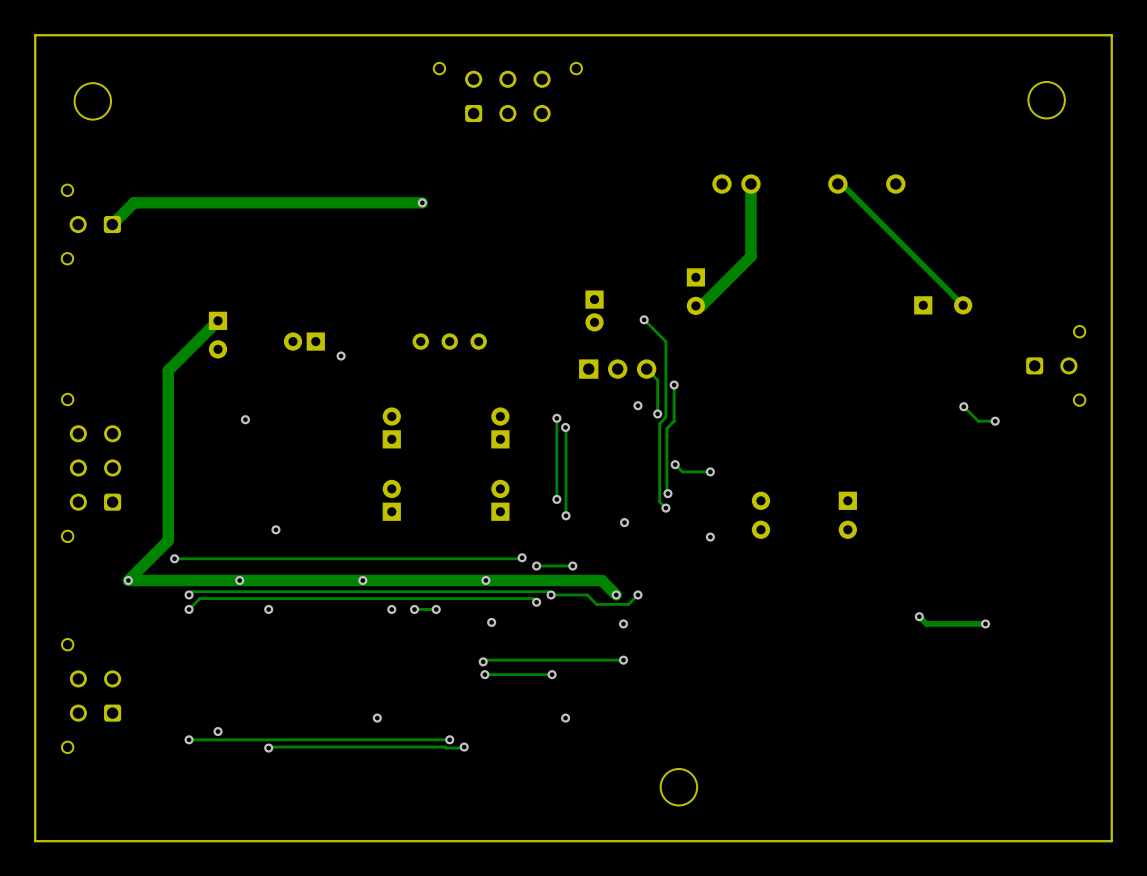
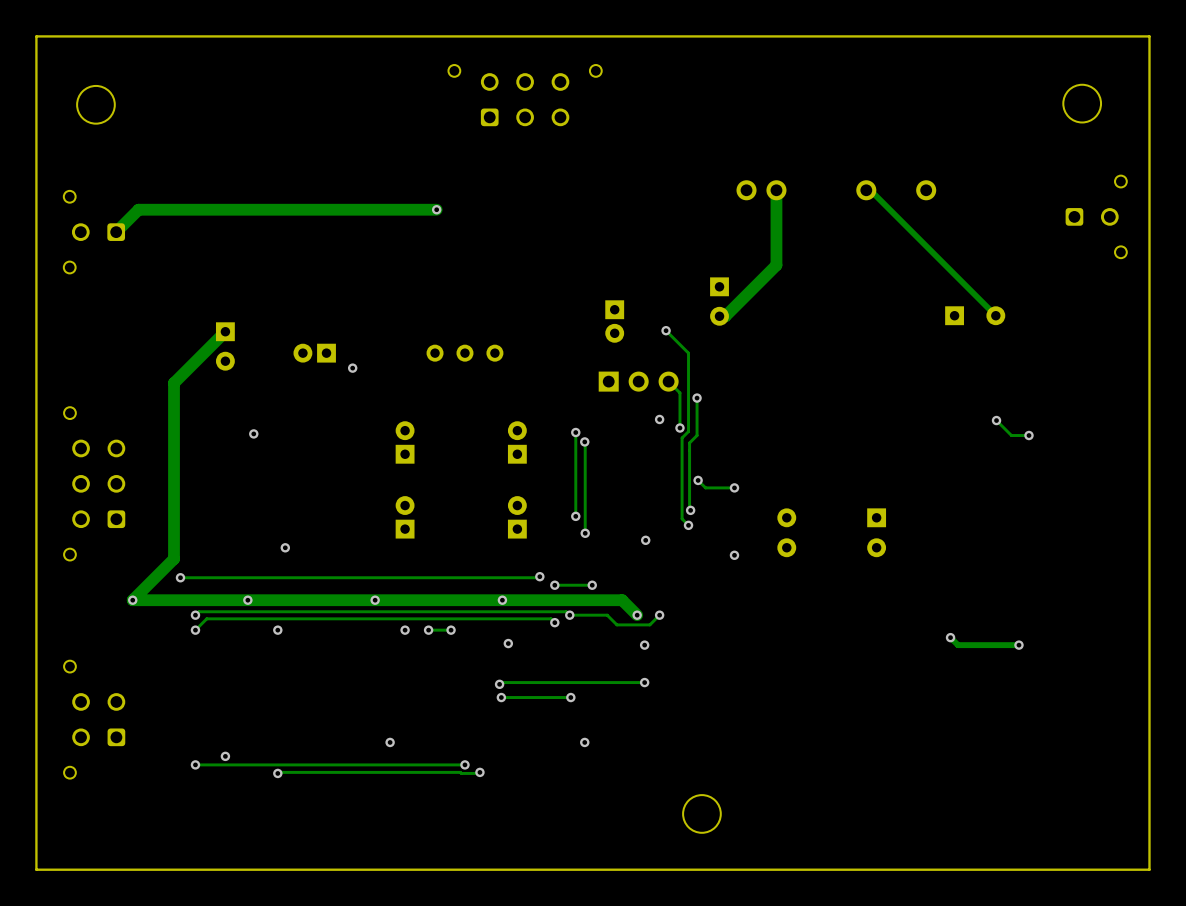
part position: (1055, 365) -> (1096, 216)

